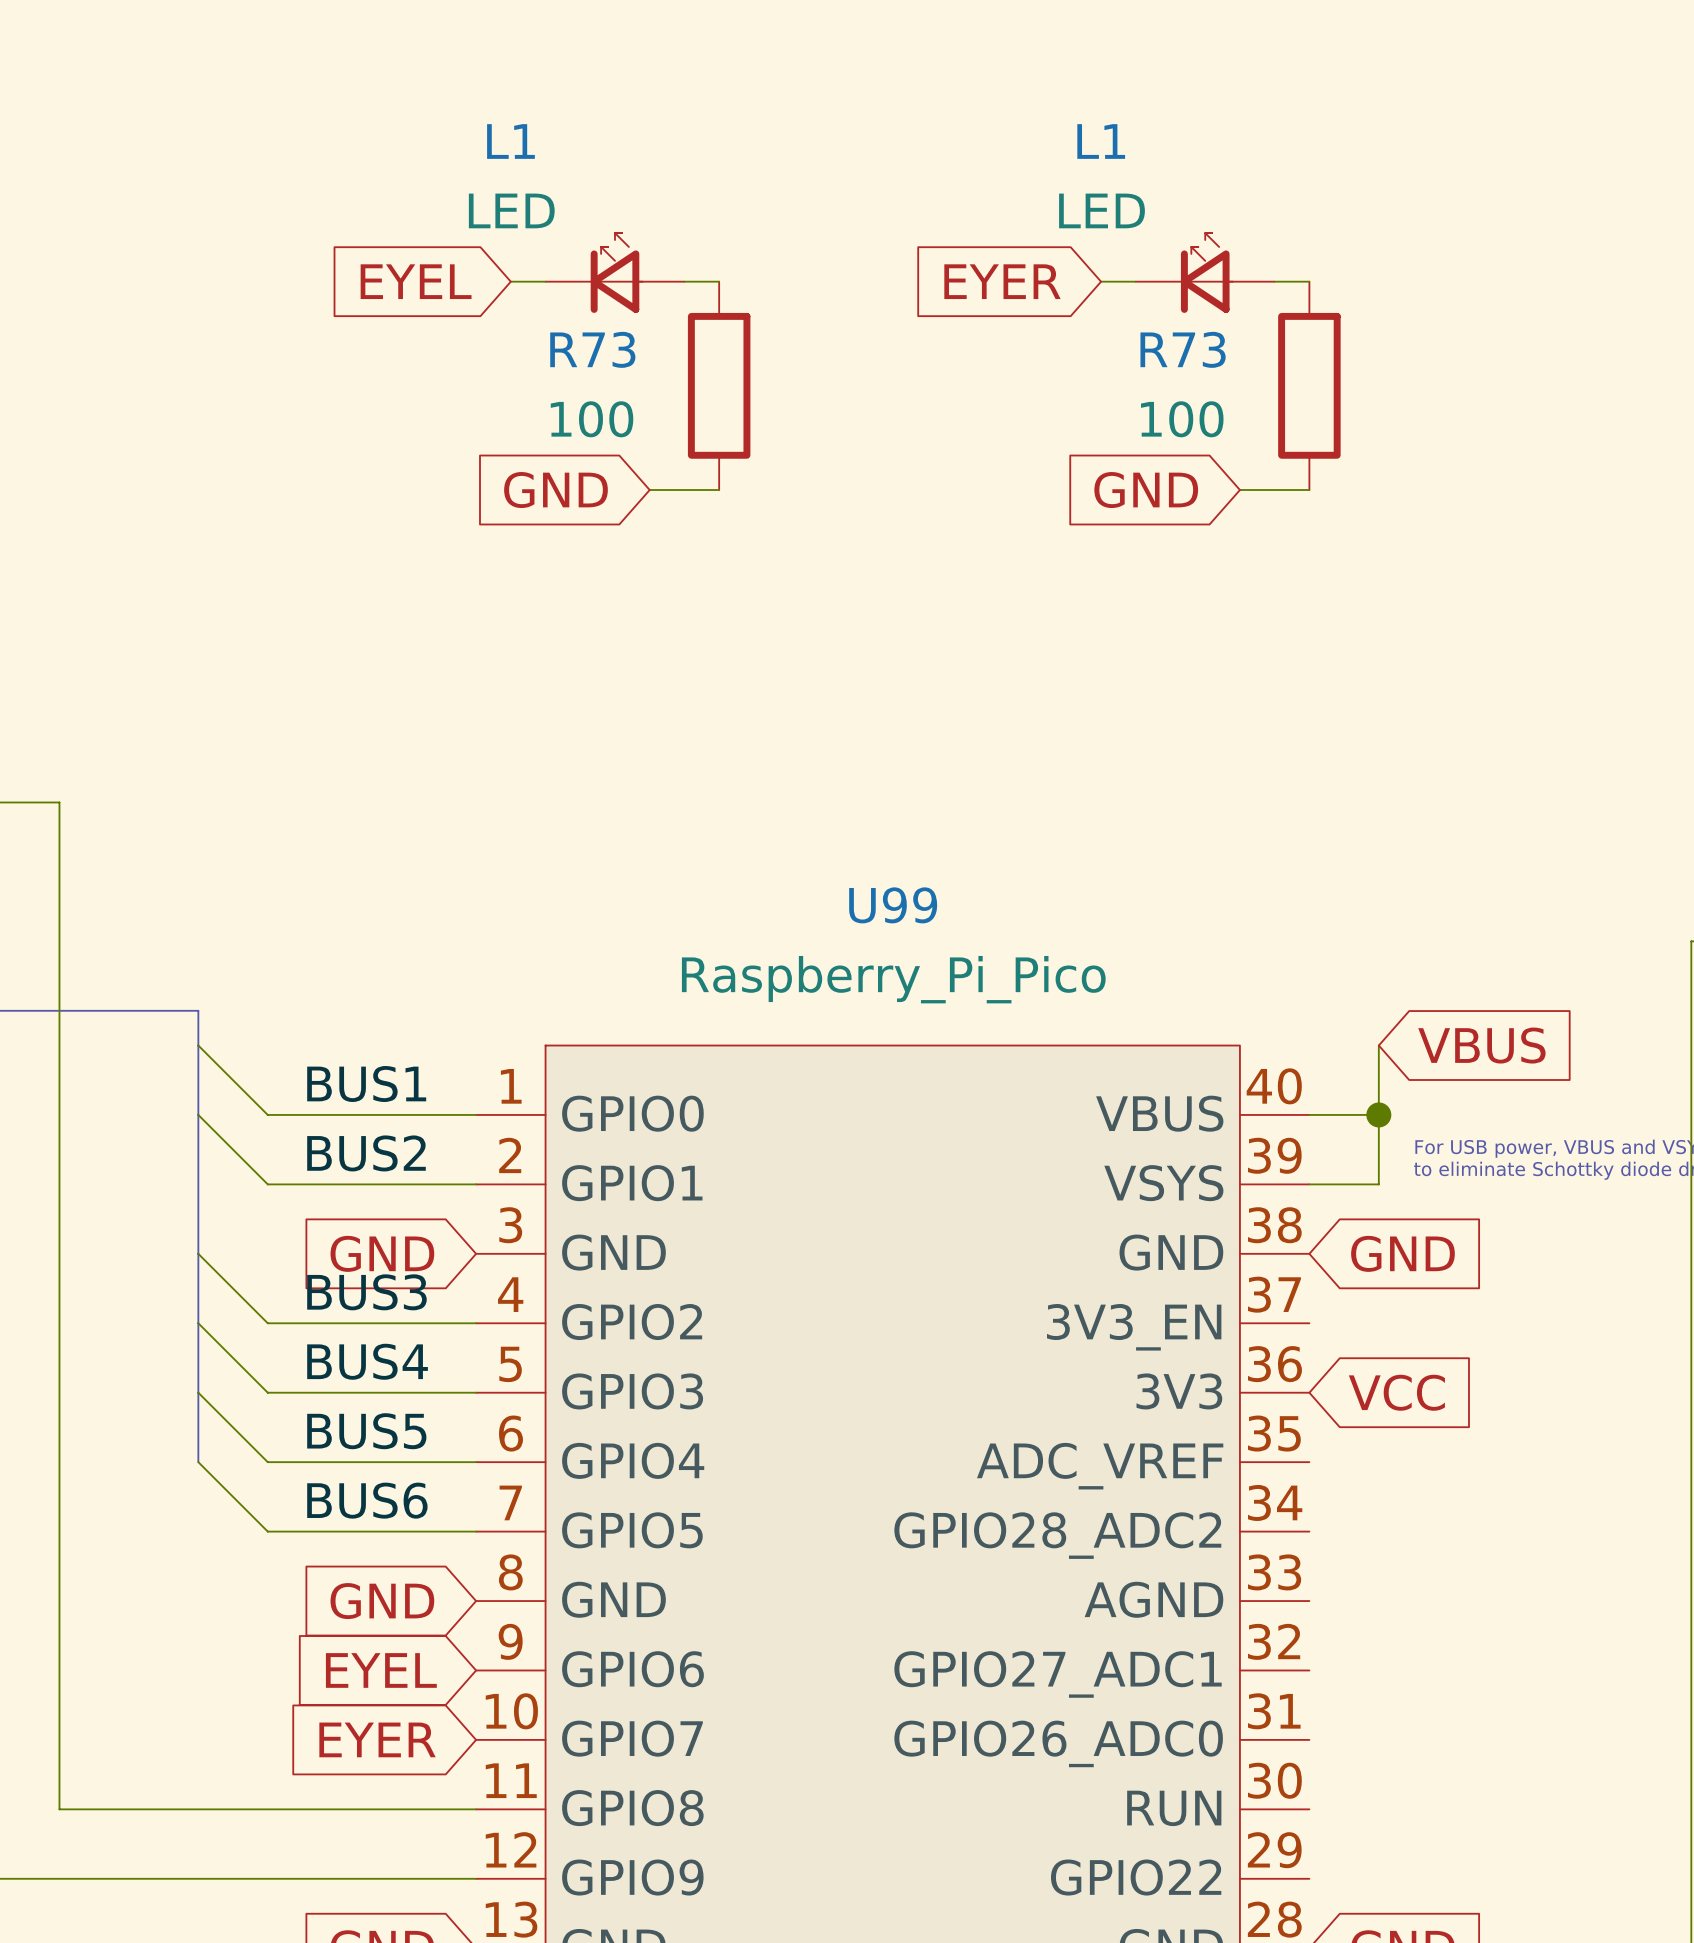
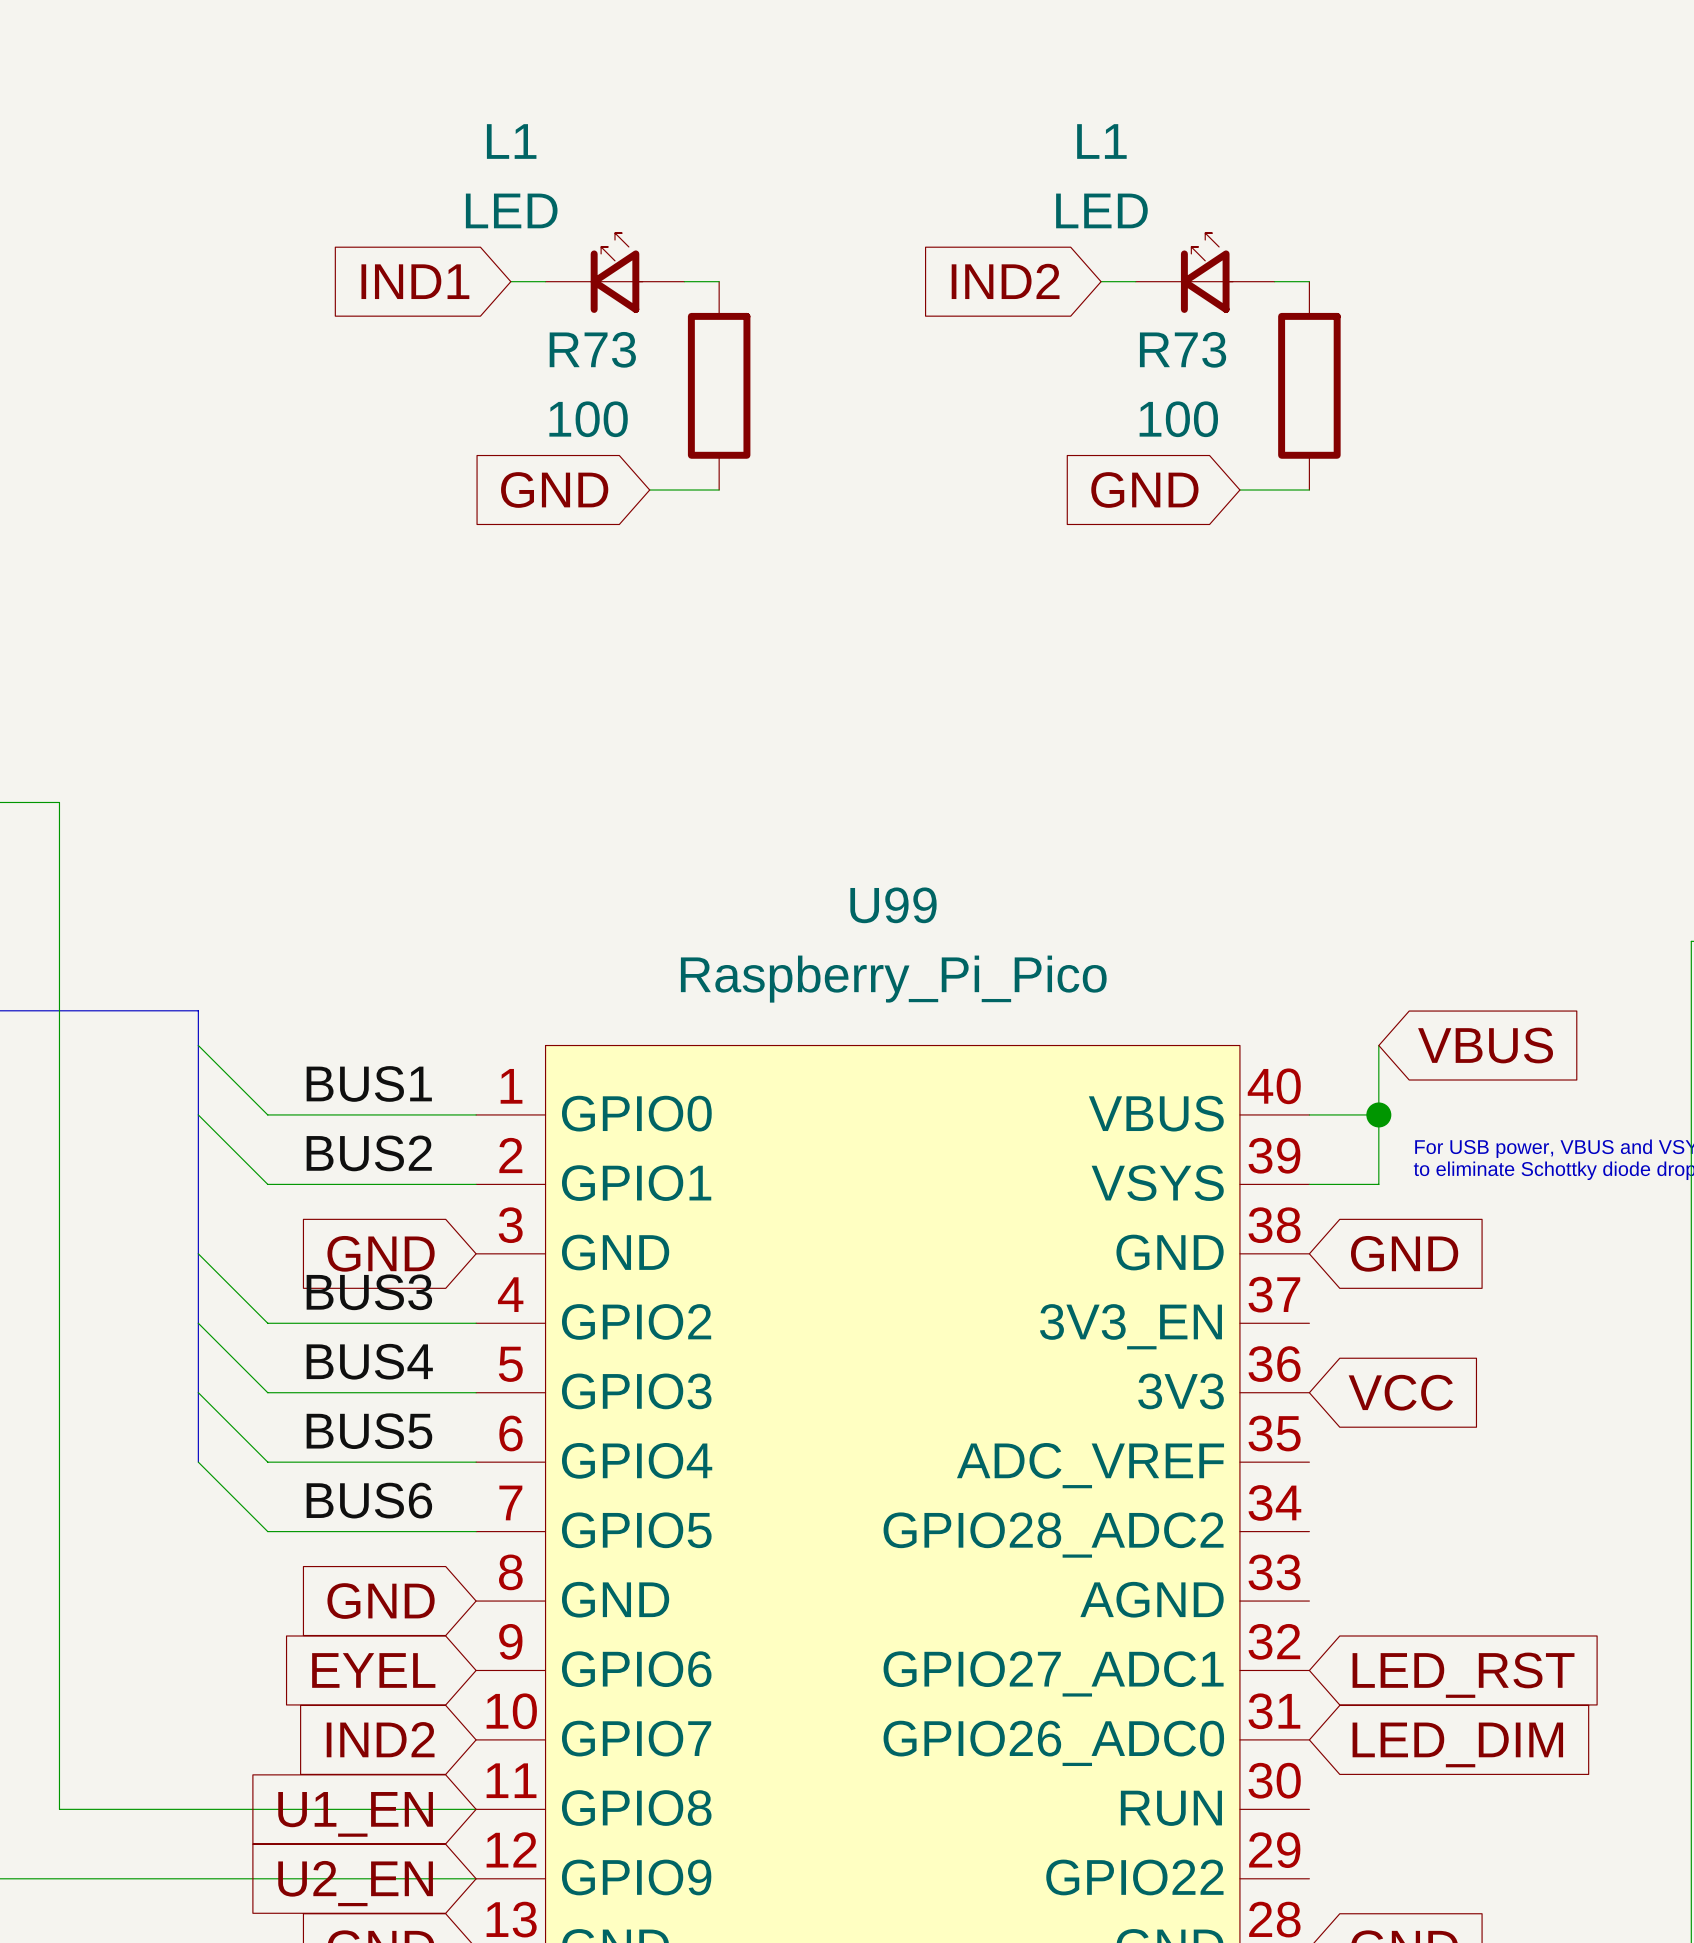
global label: EYEL (416, 281) -> IND1 (415, 281)
global label: EYER (1002, 281) -> IND2 (1005, 281)
global label: none -> LED_RST (1463, 1675)
global label: EYER (377, 1739) -> IND2 (380, 1739)
global label: none -> LED_DIM (1457, 1744)
global label: none -> U1_EN (355, 1814)
global label: none -> U2_EN (355, 1883)

